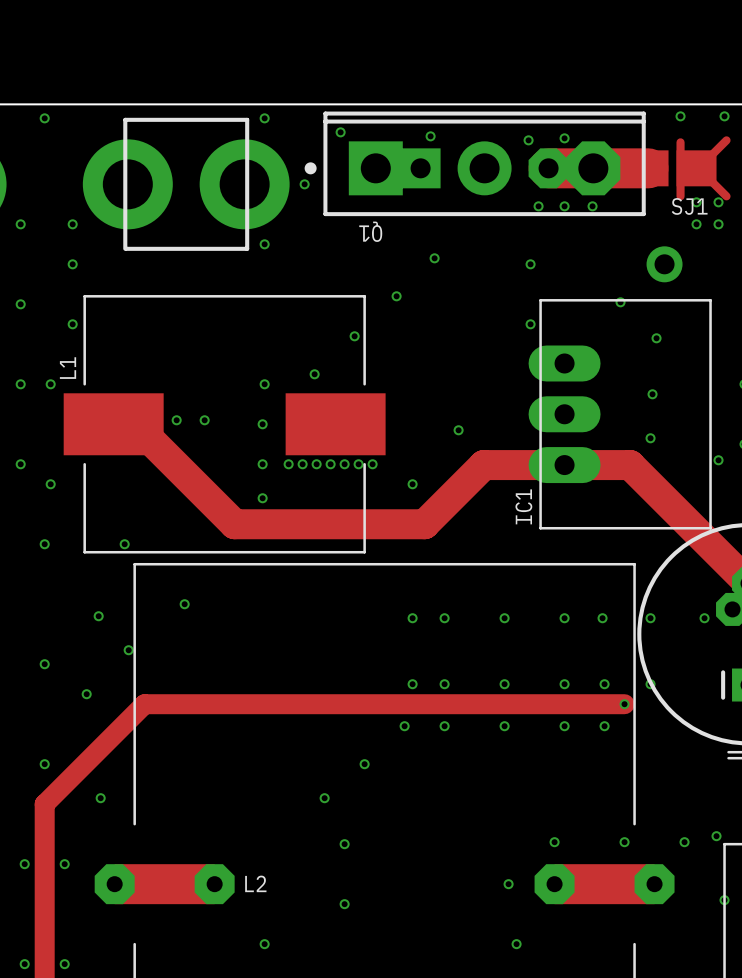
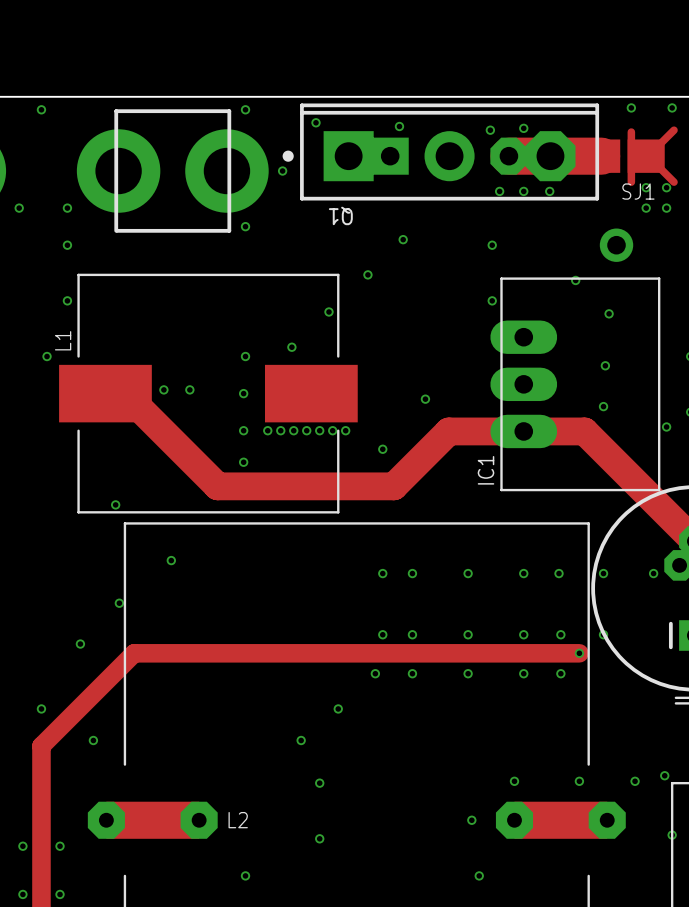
via: (20, 304) -> none
via: (20, 384) -> none
via: (20, 464) -> none
via: (50, 484) -> none
via: (44, 544) -> none
via: (98, 616) -> none
via: (44, 664) -> none
via: (24, 864) -> none
via: (64, 864) -> none
via: none -> (22, 846)
via: none -> (60, 846)

